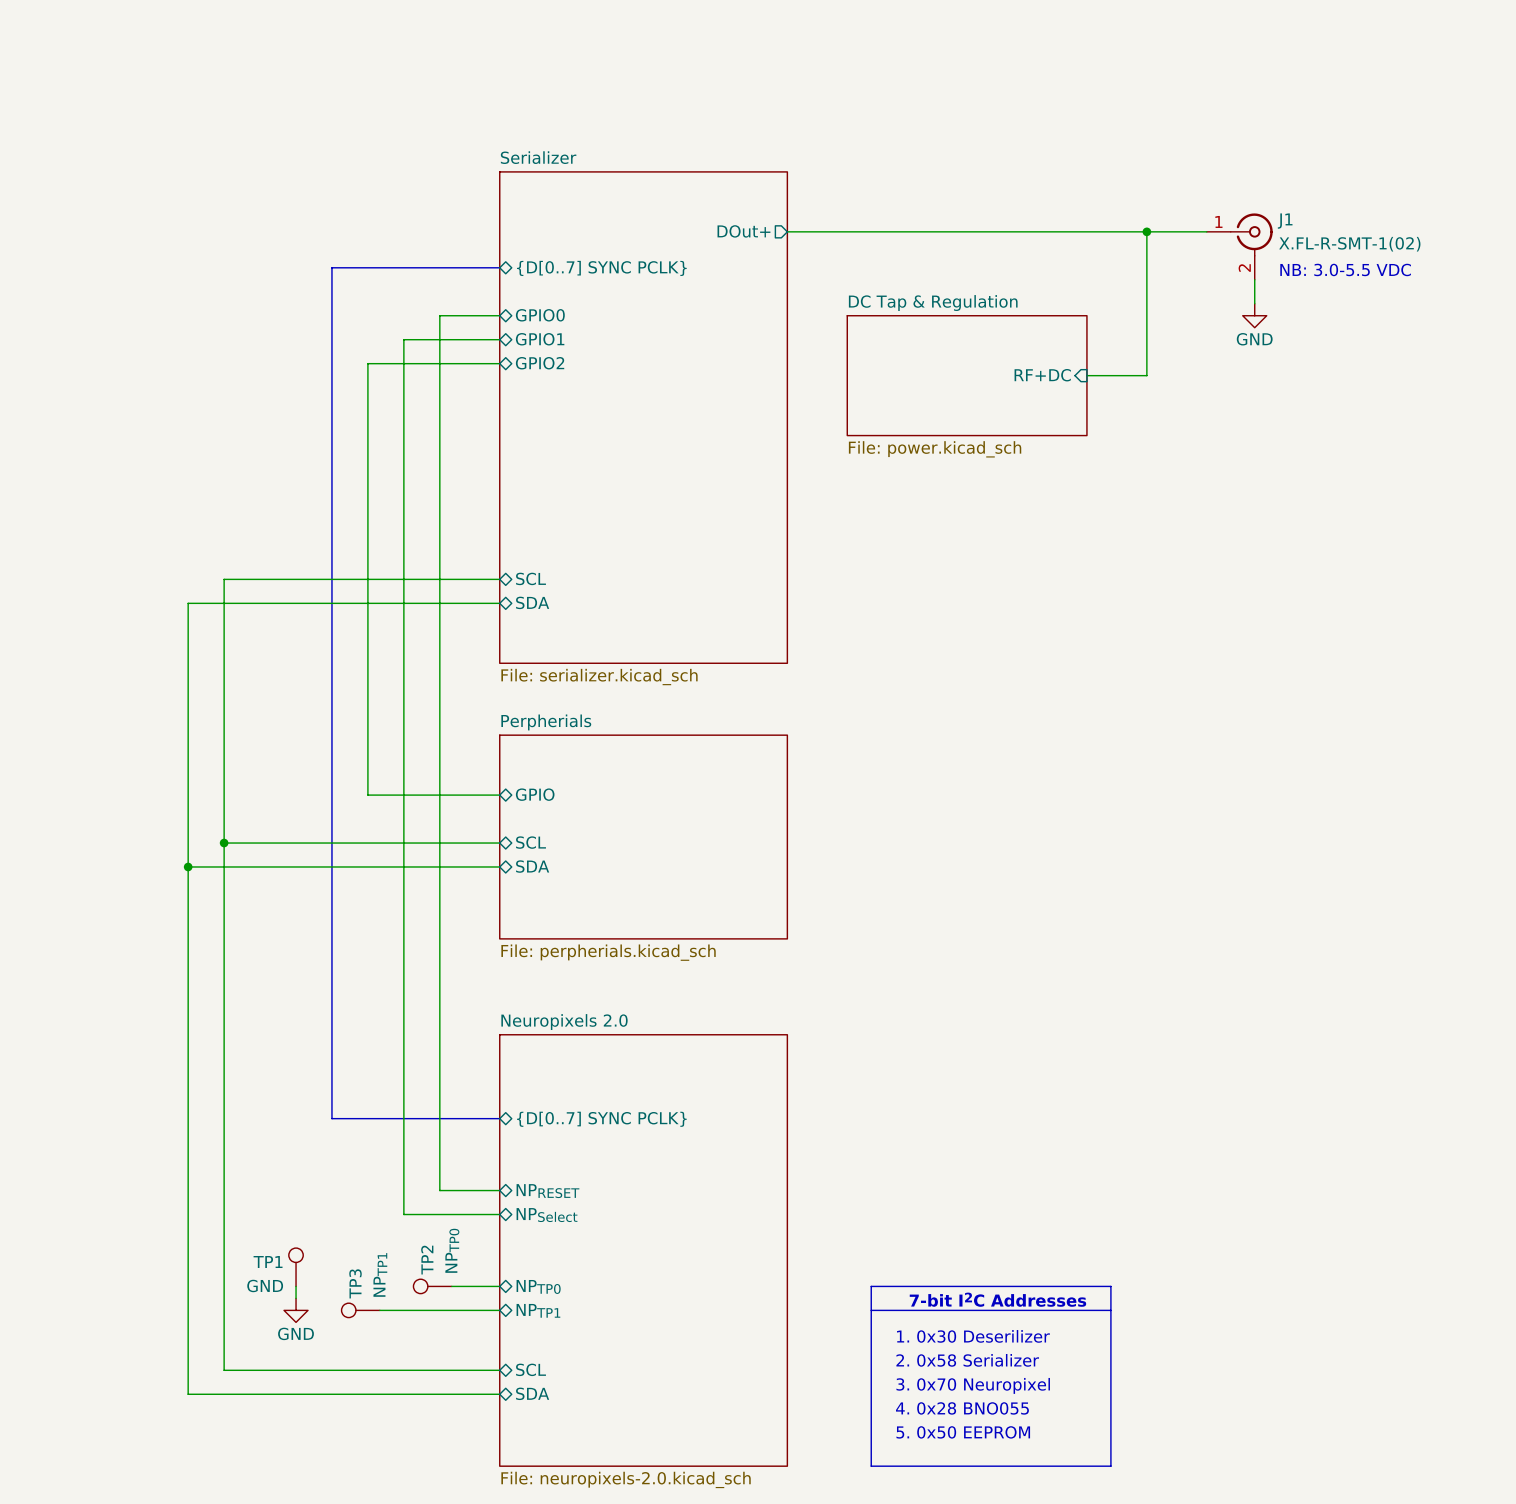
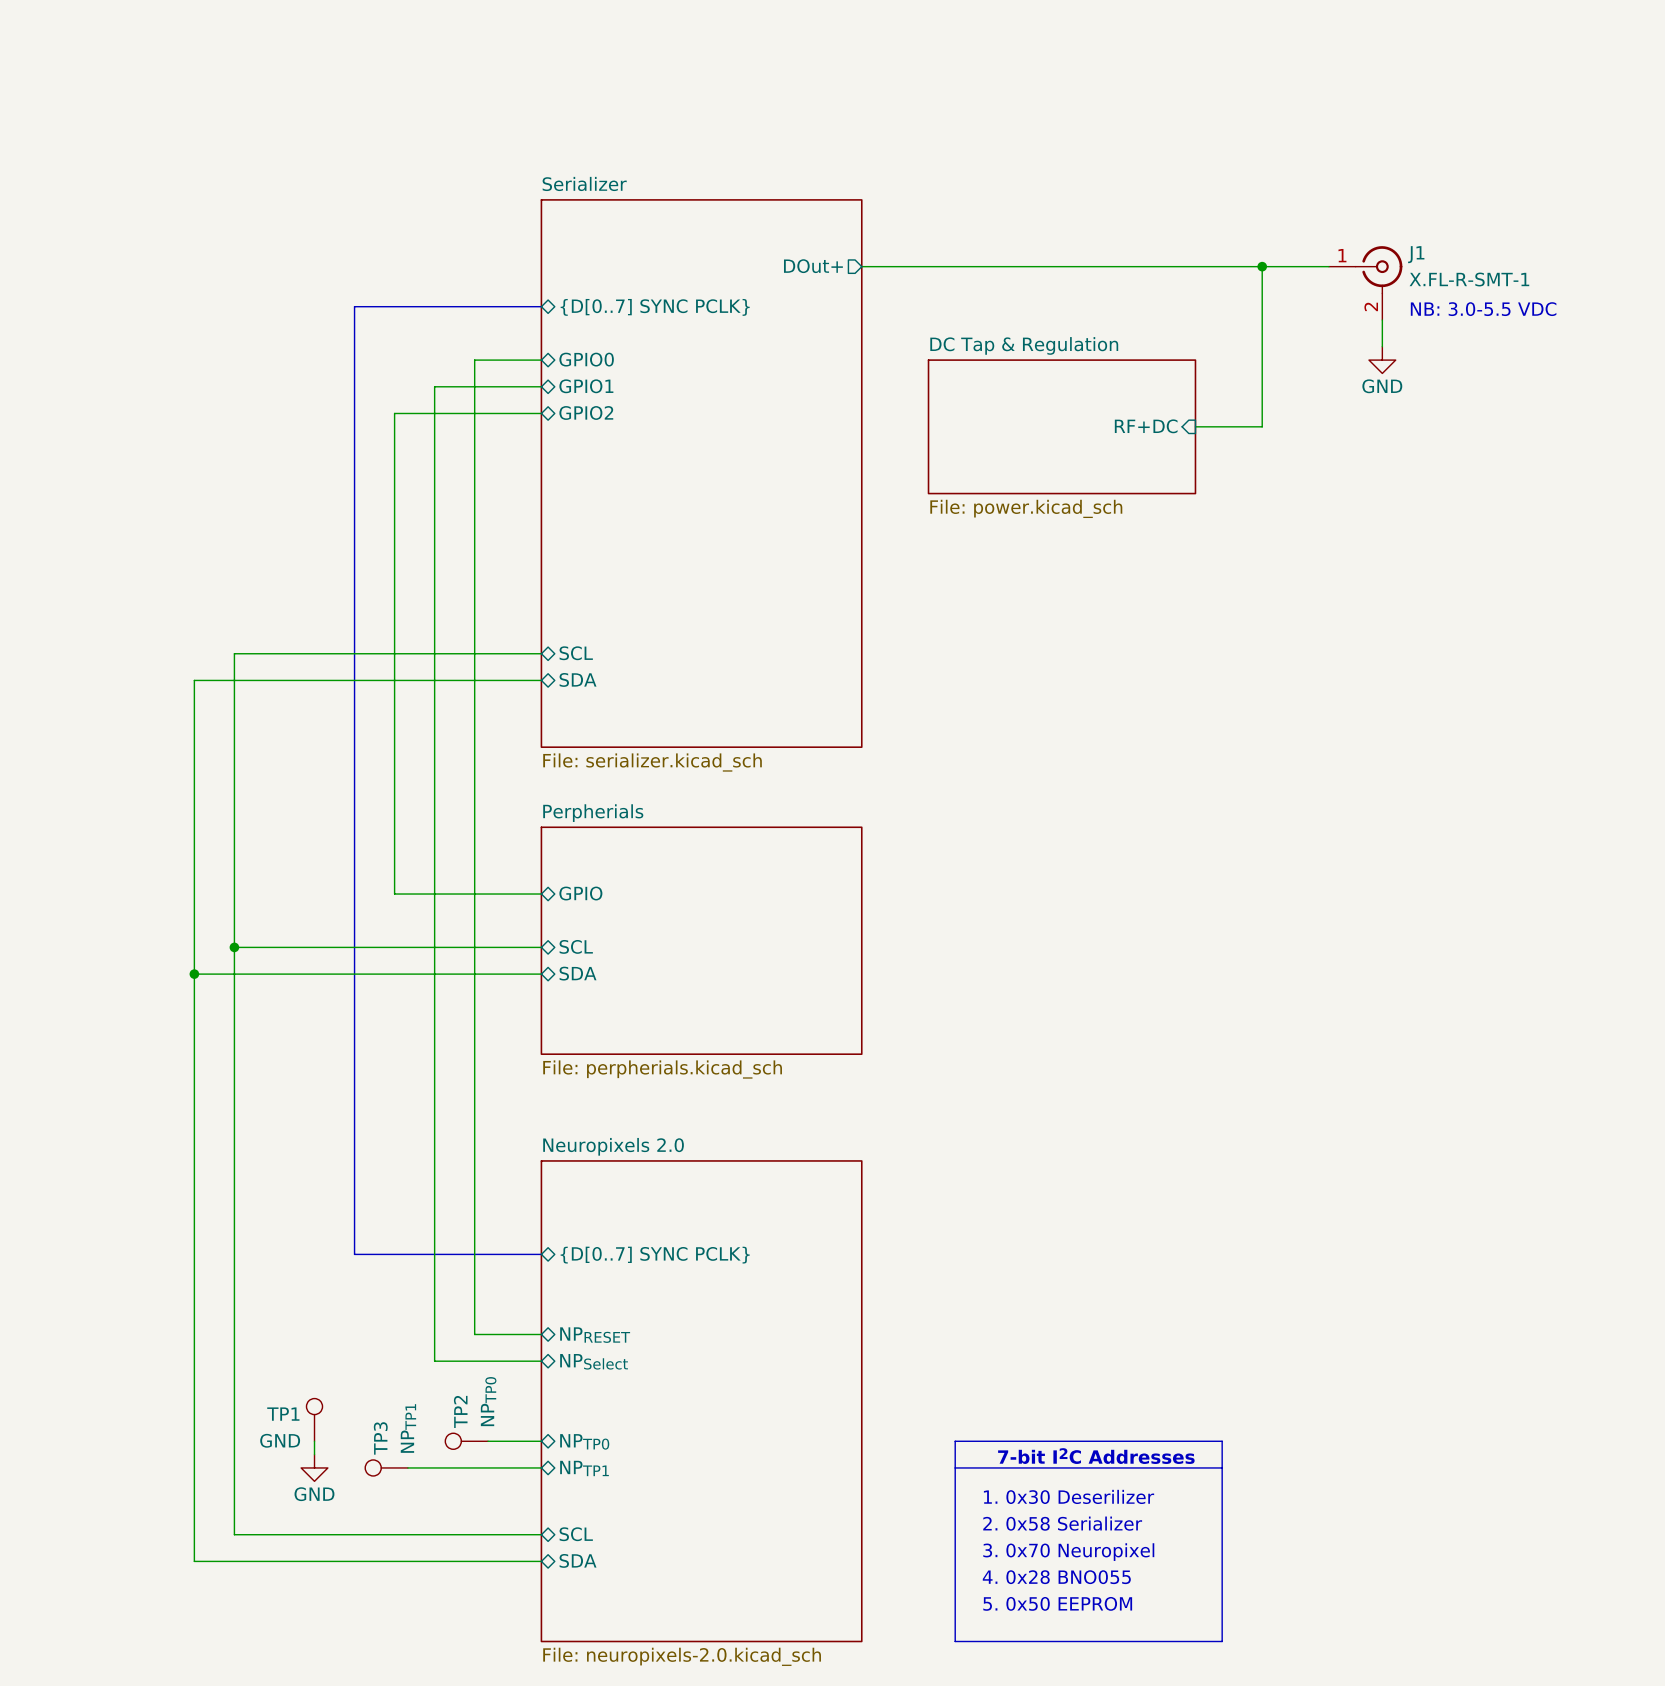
J1 value: X.FL-R-SMT-1(02) (1349, 244) -> X.FL-R-SMT-1 (1469, 279)

